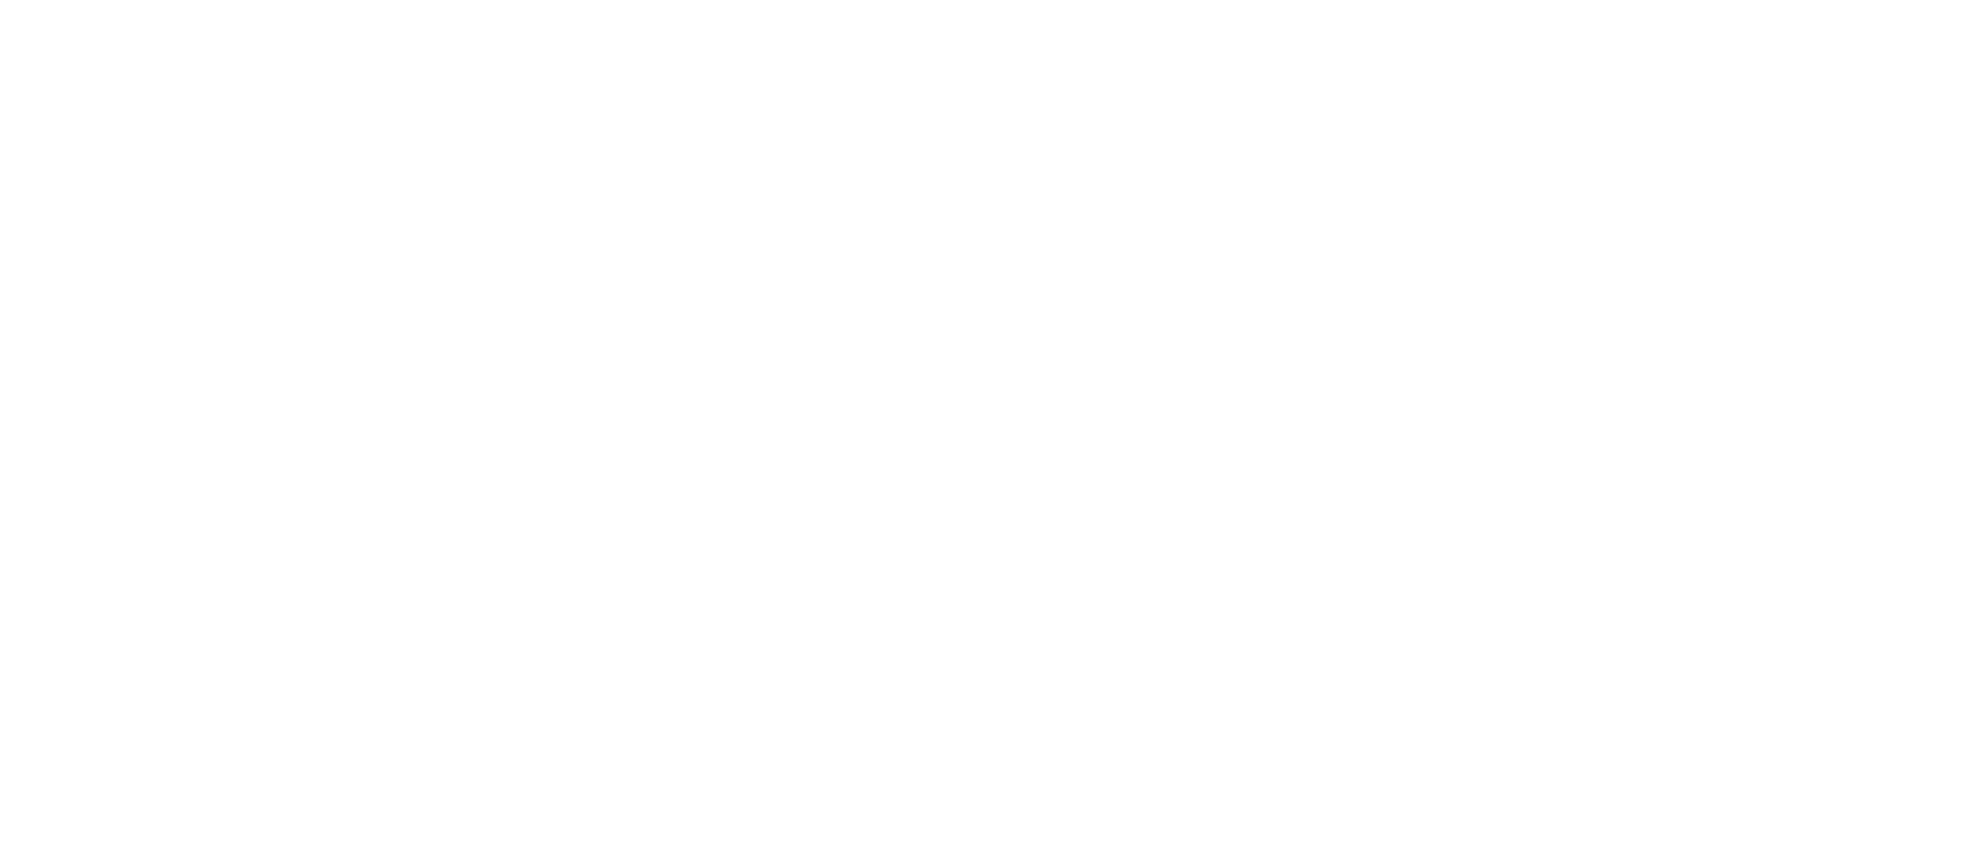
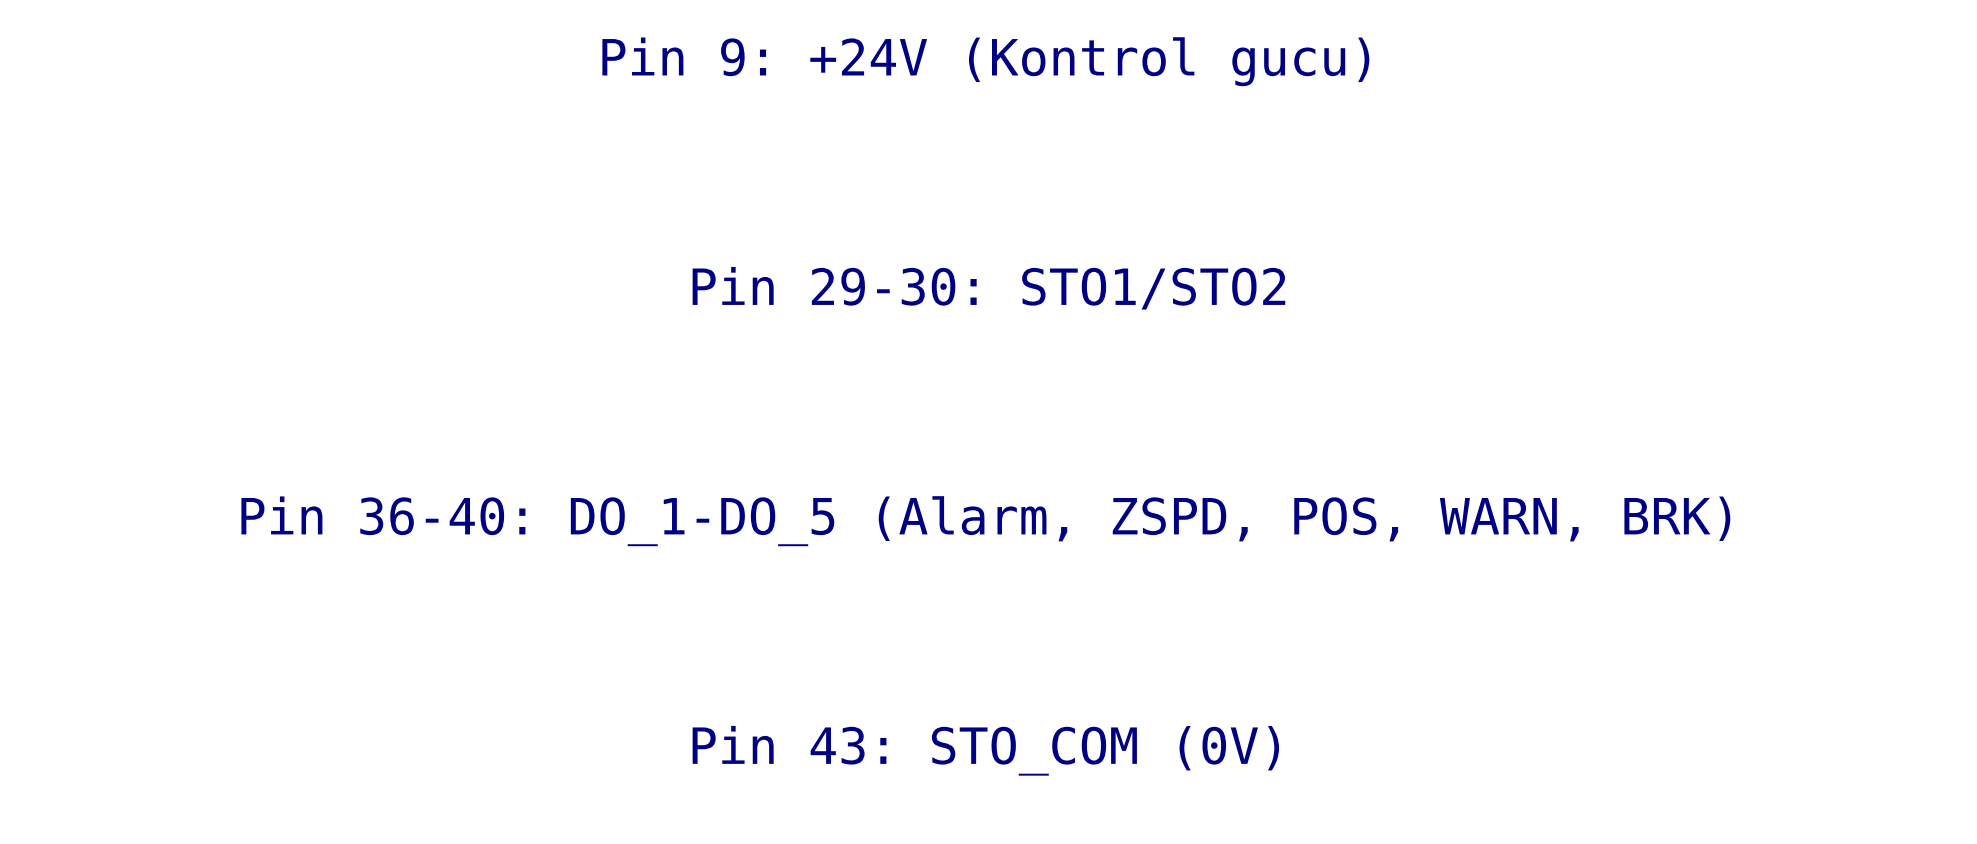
text: none -> Pin 9: +24V (Kontrol gucu) (985, 61)
text: none -> Pin 29-30: STO1/STO2 (988, 288)
text: none -> Pin 36-40: DO_1-DO_5 (Alarm, ZSPD, POS, WARN, BRK) (985, 521)
text: none -> Pin 43: STO_COM (0V) (985, 750)

